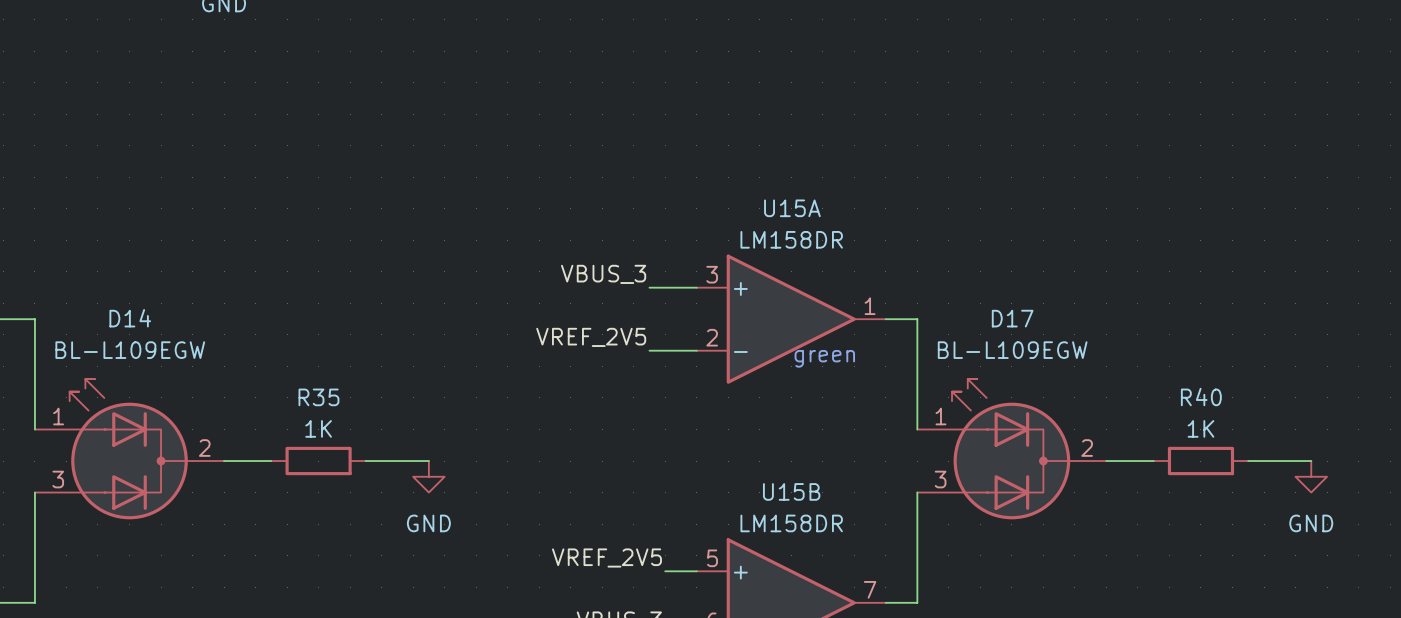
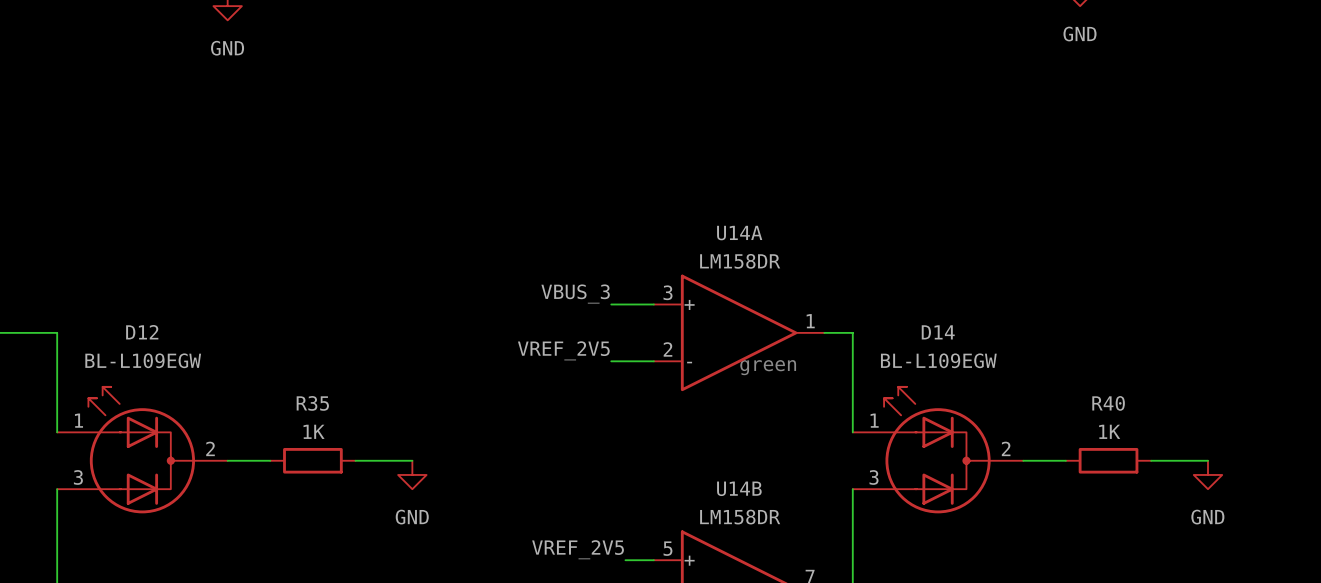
U15A name: U15A (792, 208) -> U14A (739, 233)
D14 name: D14 (130, 318) -> D12 (142, 332)
D17 name: D17 (1012, 318) -> D14 (938, 332)
U15B name: U15B (791, 491) -> U14B (739, 488)

